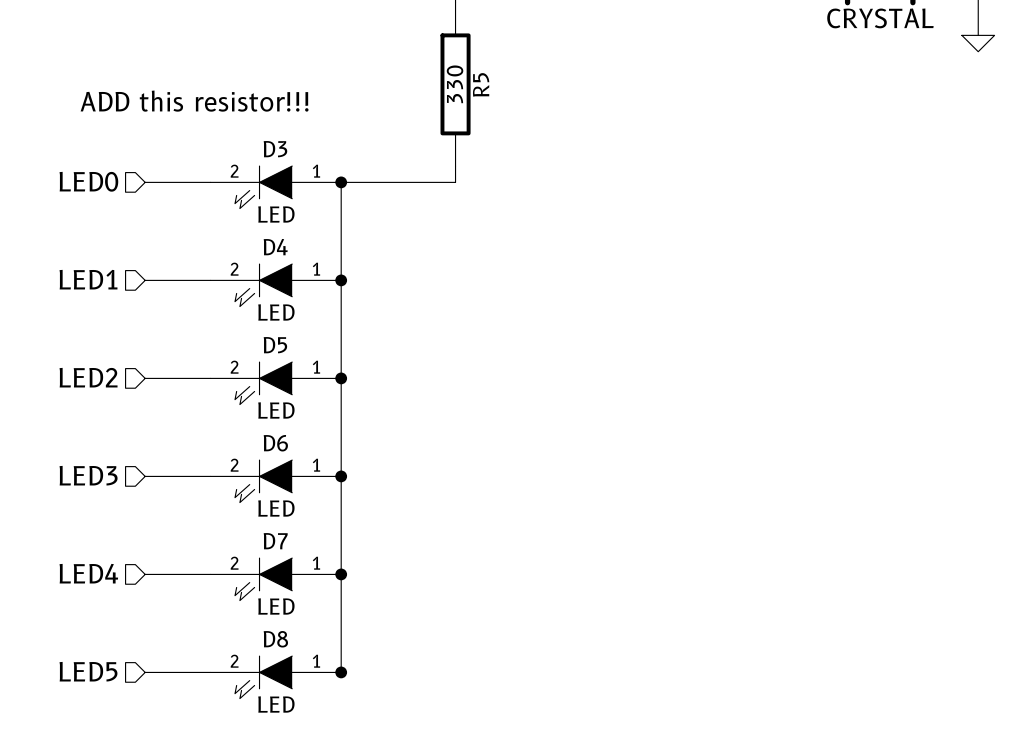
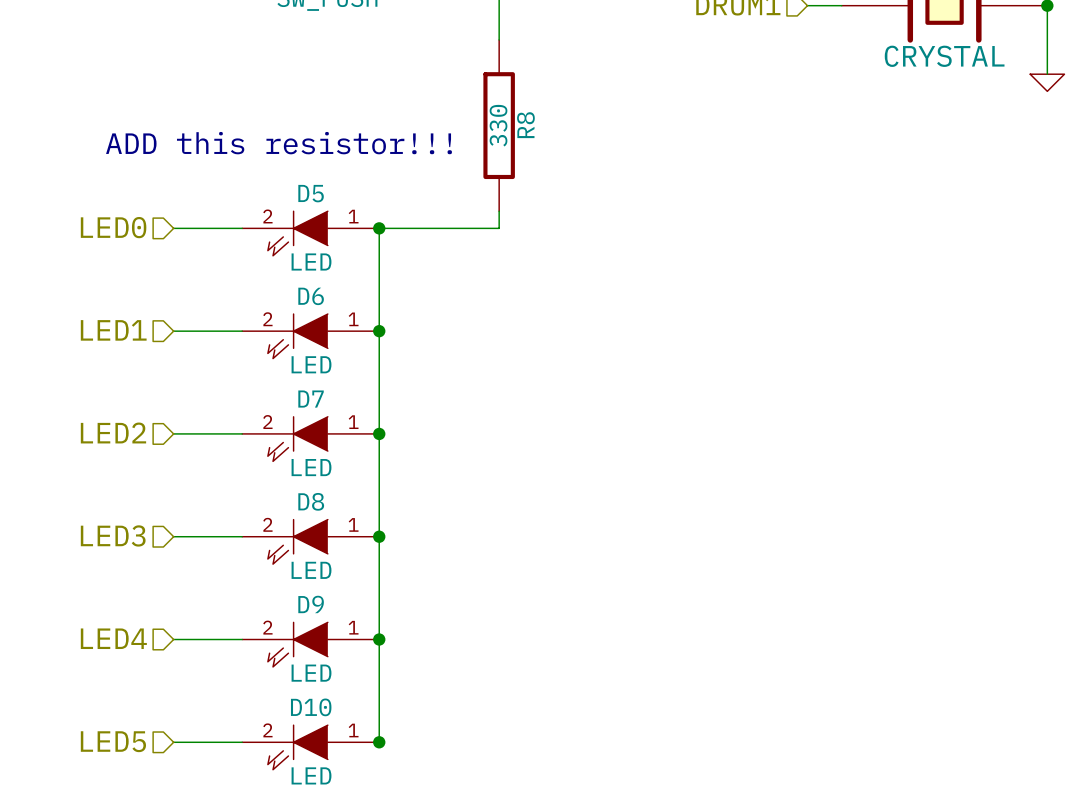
R5 name: R5 (481, 84) -> R8 (525, 125)
D3 name: D3 (275, 149) -> D5 (311, 193)
D4 name: D4 (275, 247) -> D6 (311, 296)
D5 name: D5 (275, 345) -> D7 (311, 399)
D6 name: D6 (275, 443) -> D8 (311, 501)
D7 name: D7 (275, 541) -> D9 (311, 604)
D8 name: D8 (275, 639) -> D10 (311, 707)

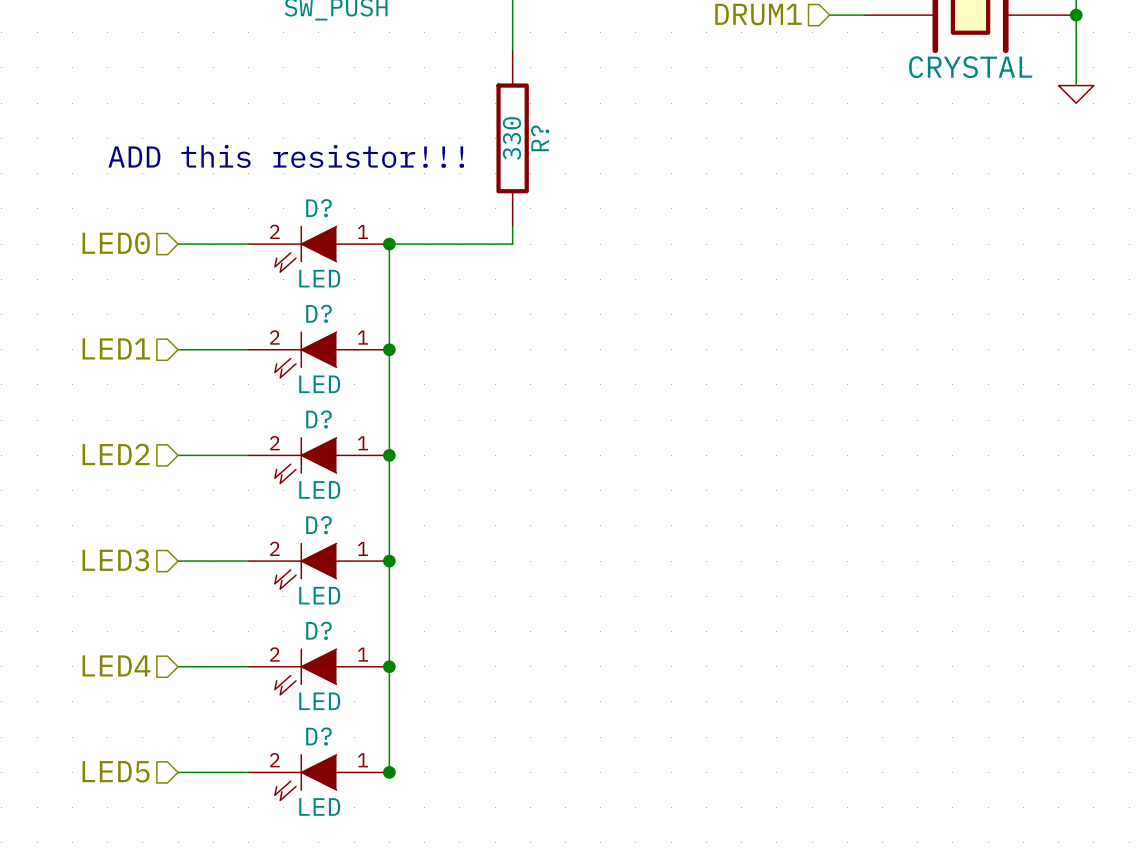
R8 name: R8 (525, 125) -> R? (540, 138)
D5 name: D5 (311, 193) -> D? (318, 208)
D6 name: D6 (311, 296) -> D? (318, 313)
D7 name: D7 (311, 399) -> D? (318, 419)
D8 name: D8 (311, 501) -> D? (318, 525)
D9 name: D9 (311, 604) -> D? (318, 630)
D10 name: D10 (311, 707) -> D? (318, 736)

